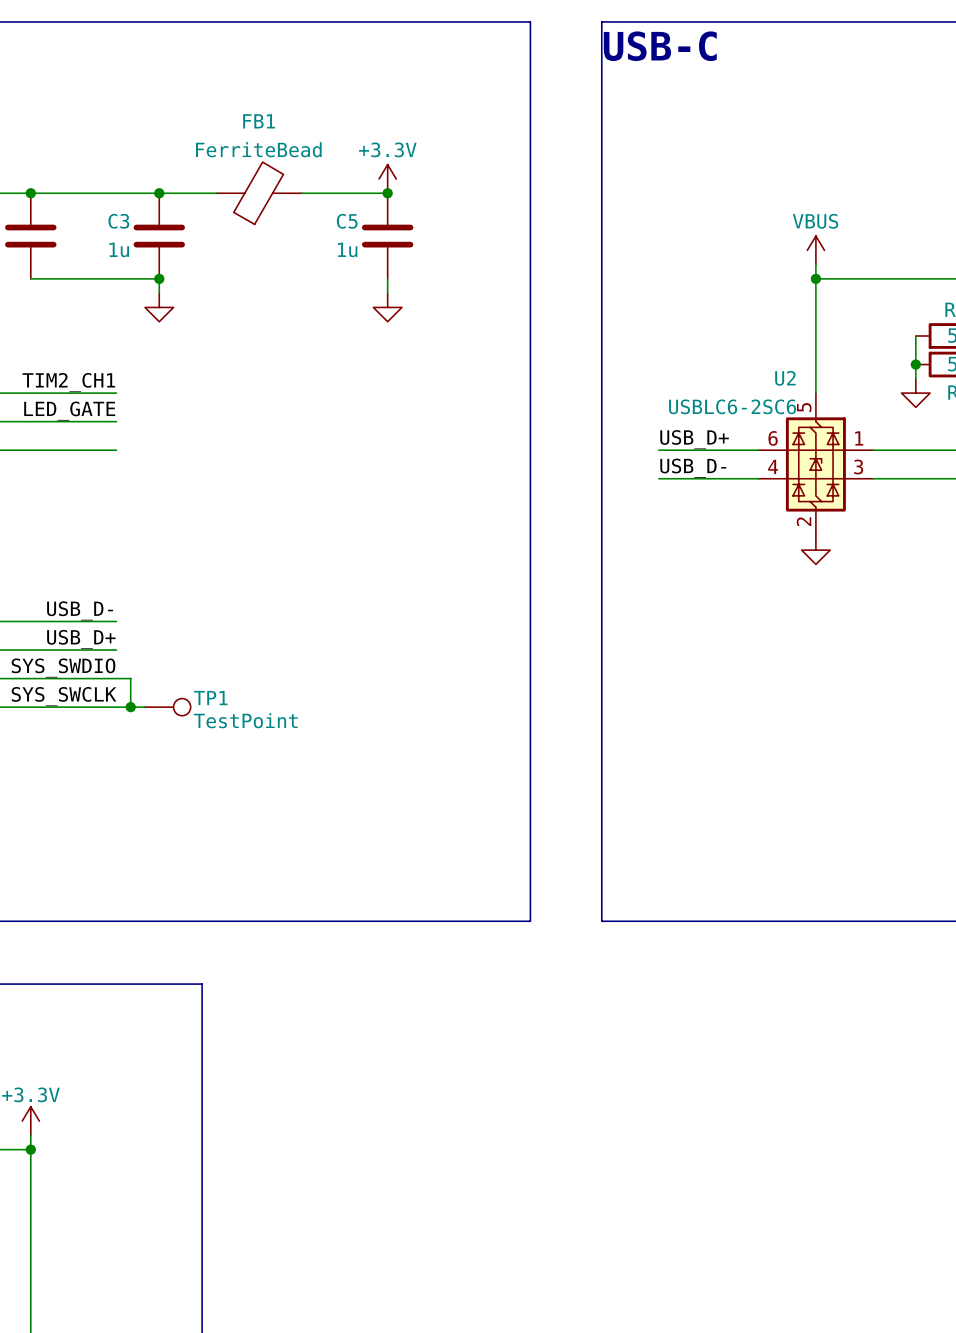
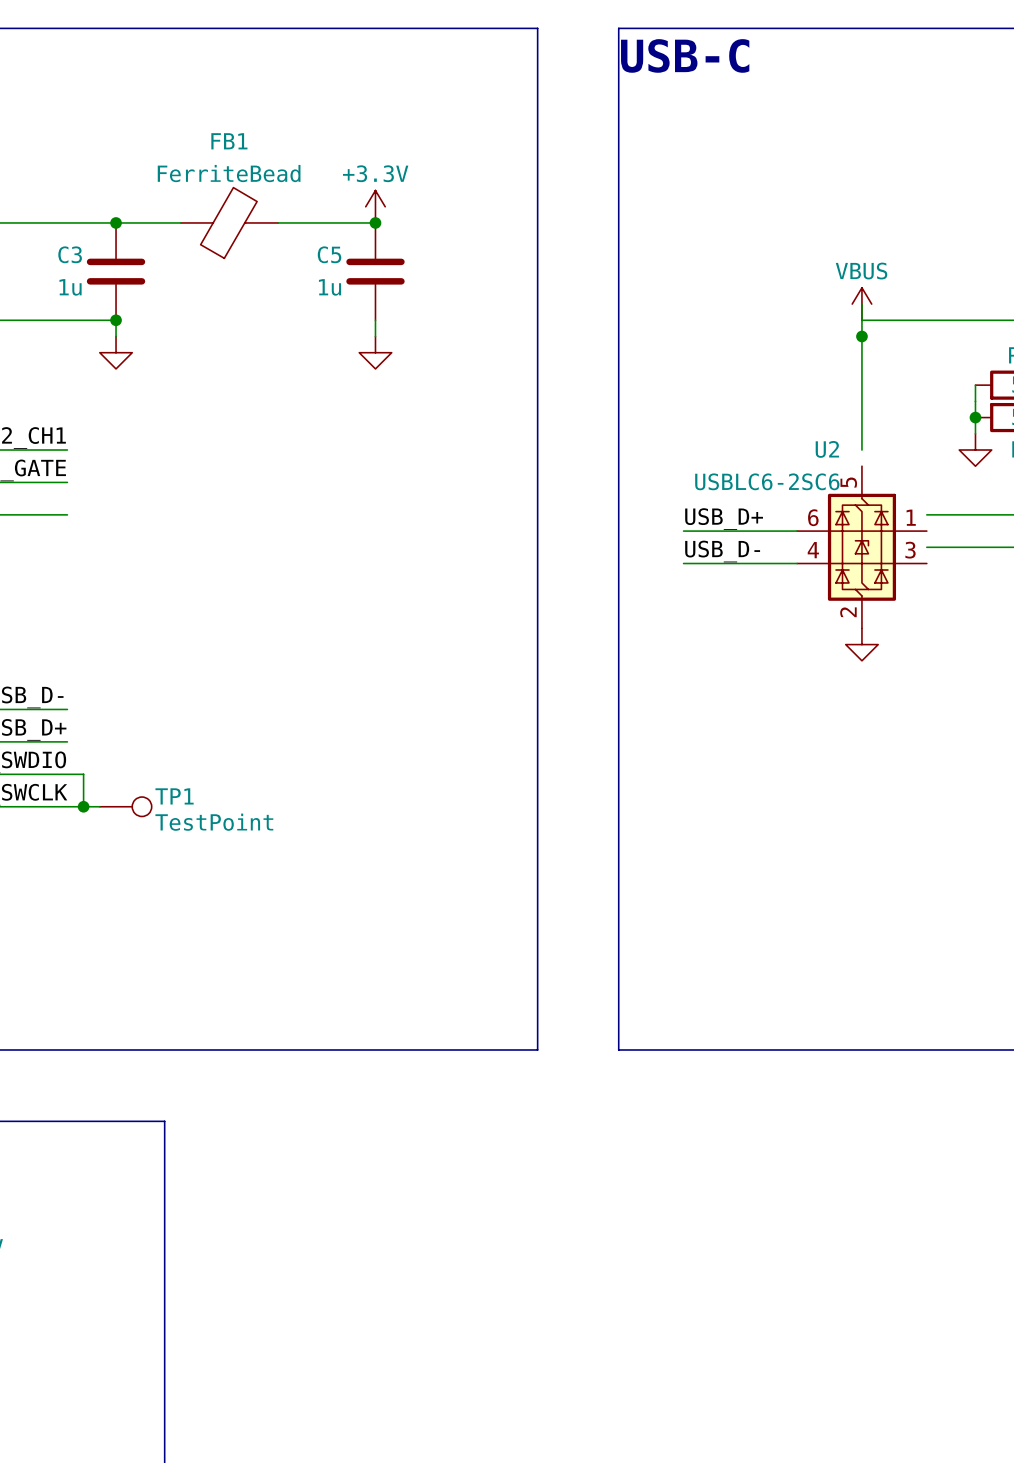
power symbol position: VBUS (815, 250) -> VBUS (861, 304)
junction position: (815, 278) -> (861, 336)
label position: USB_D+ (694, 439) -> USB_D+ (724, 519)
wire: (658, 450) (758, 450) -> (683, 531) (797, 531)
U2 position: (815, 464) -> (861, 547)
label position: USB_D- (693, 468) -> USB_D- (722, 551)
wire: (658, 478) (758, 478) -> (683, 563) (797, 563)
power symbol position: (815, 550) -> (861, 644)

